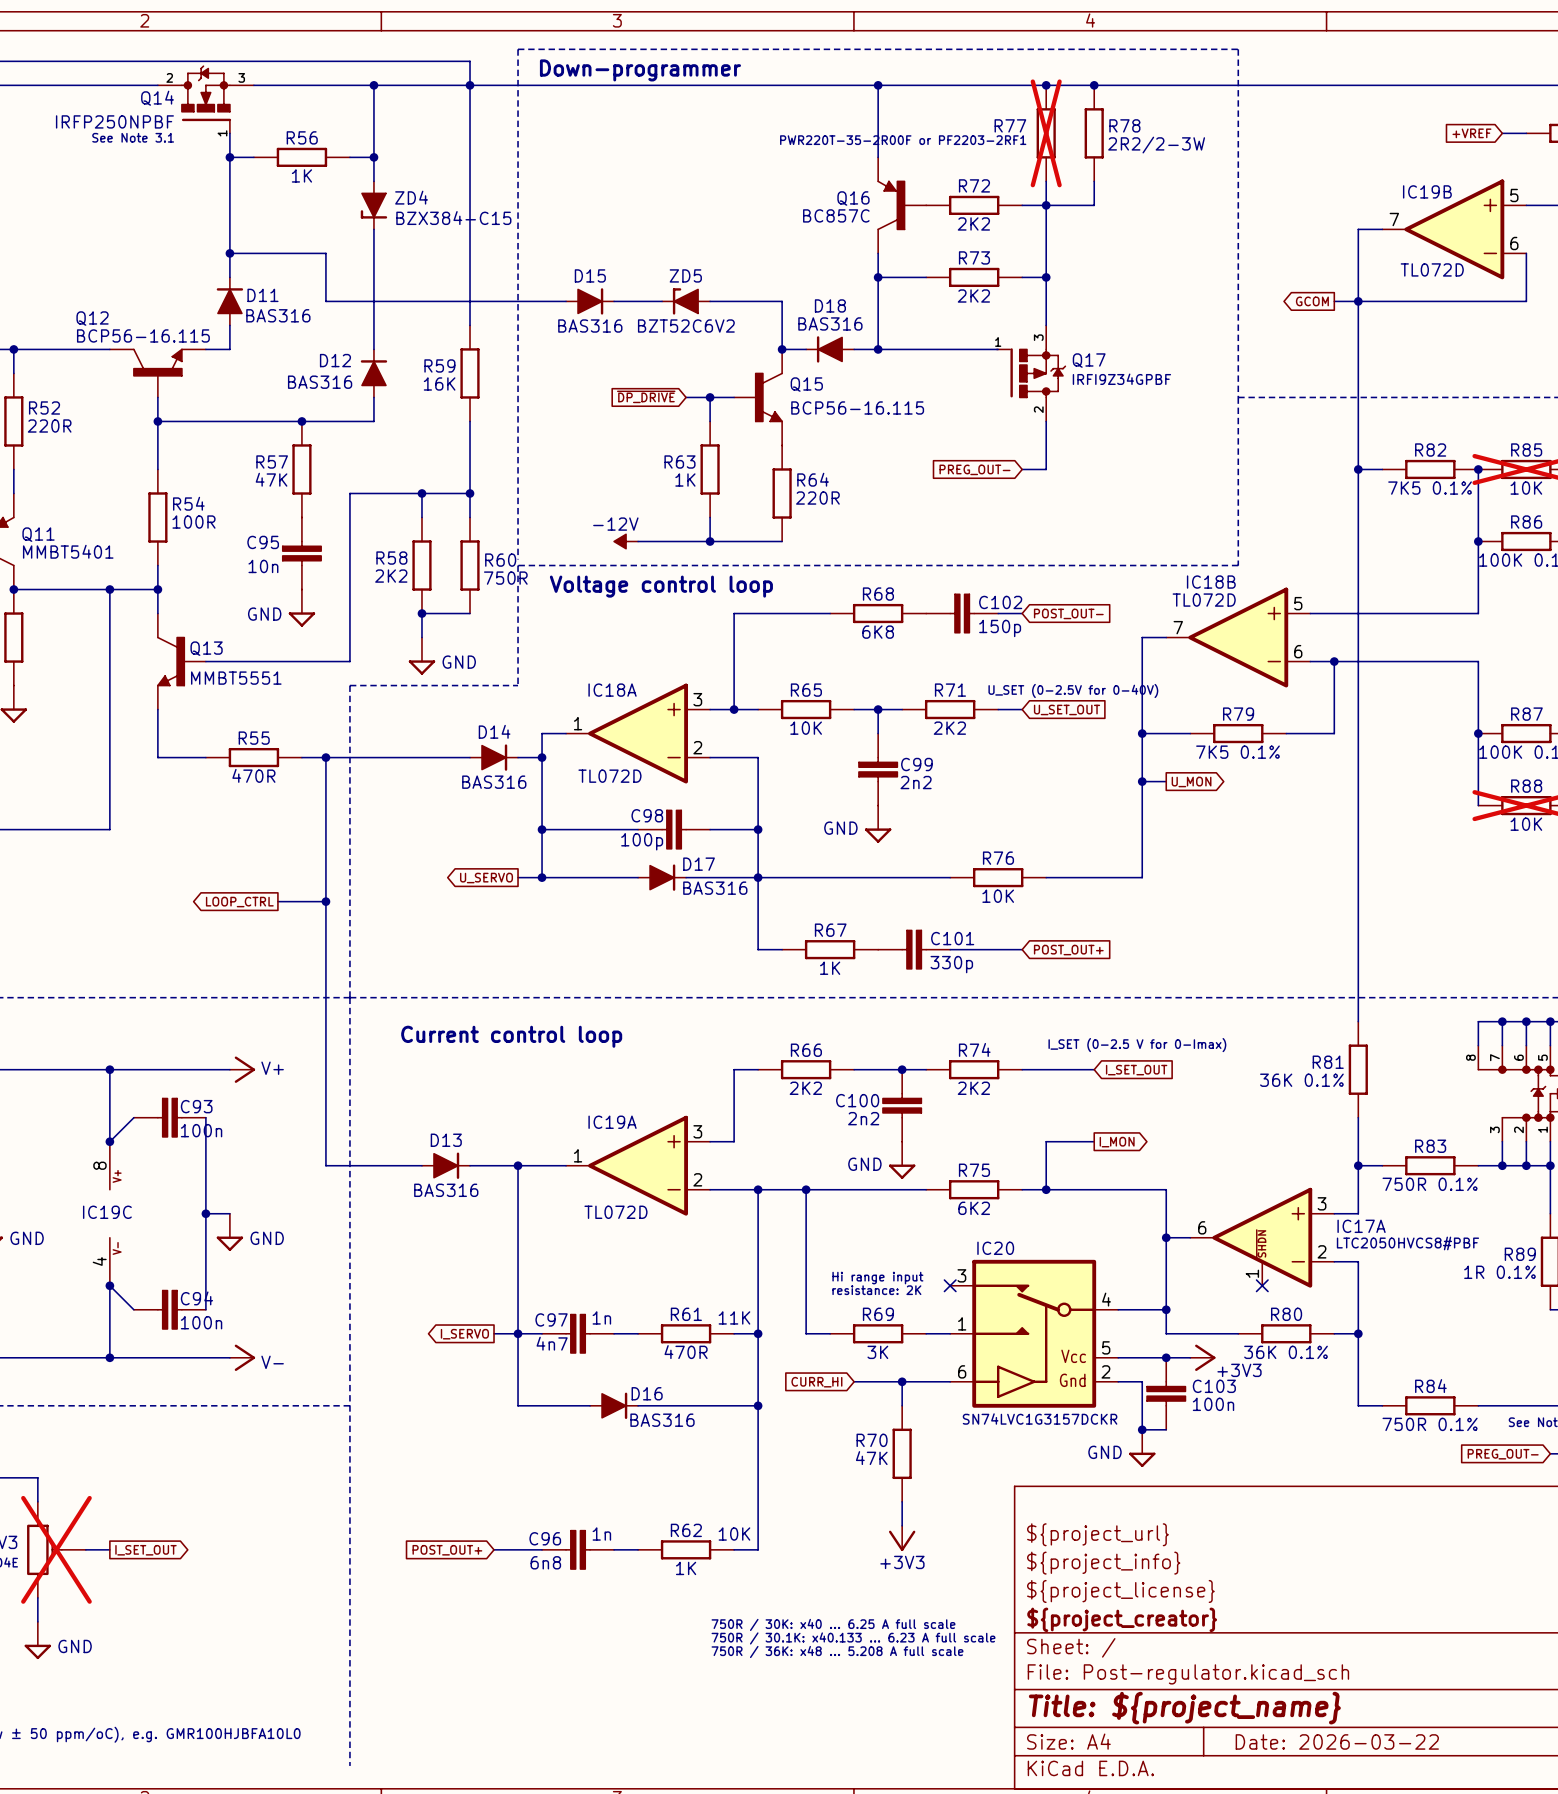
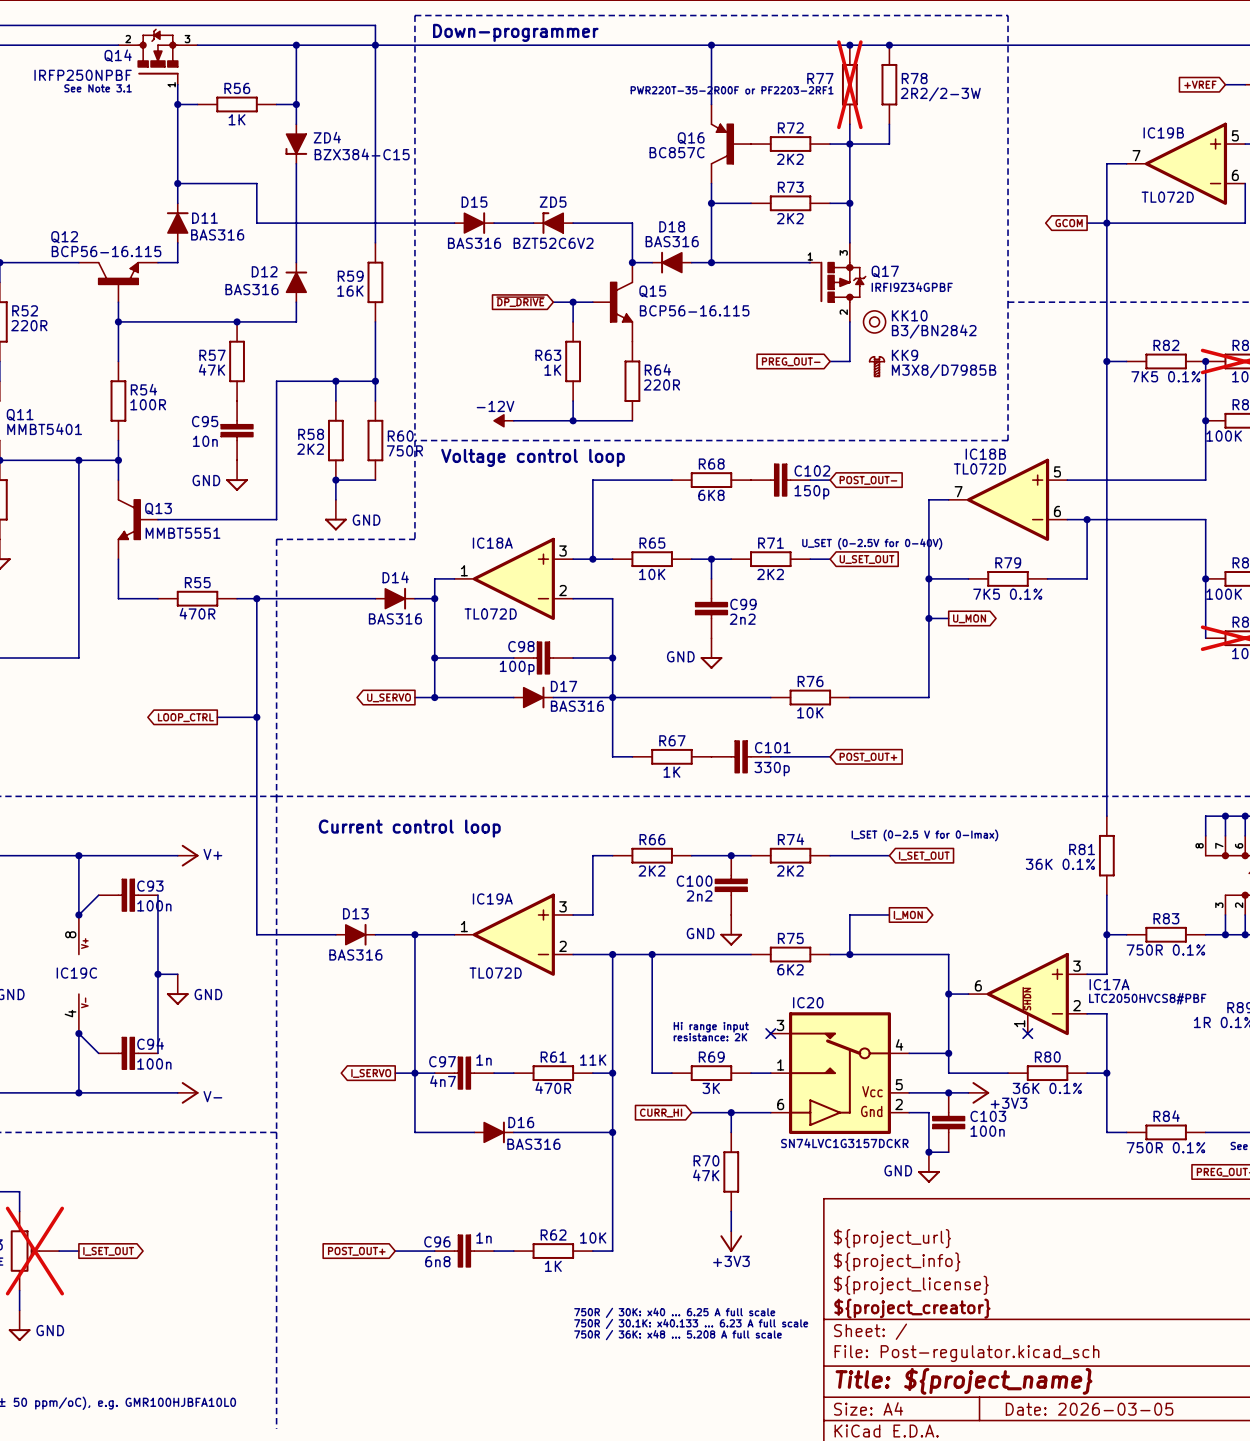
KK10: none -> B3/BN2842 (874, 321)
KK9: none -> M3X8/D7985B (877, 366)
title block: Date: 2026-03-22 (1337, 1741) -> Date: 2026-03-05 (1089, 1409)

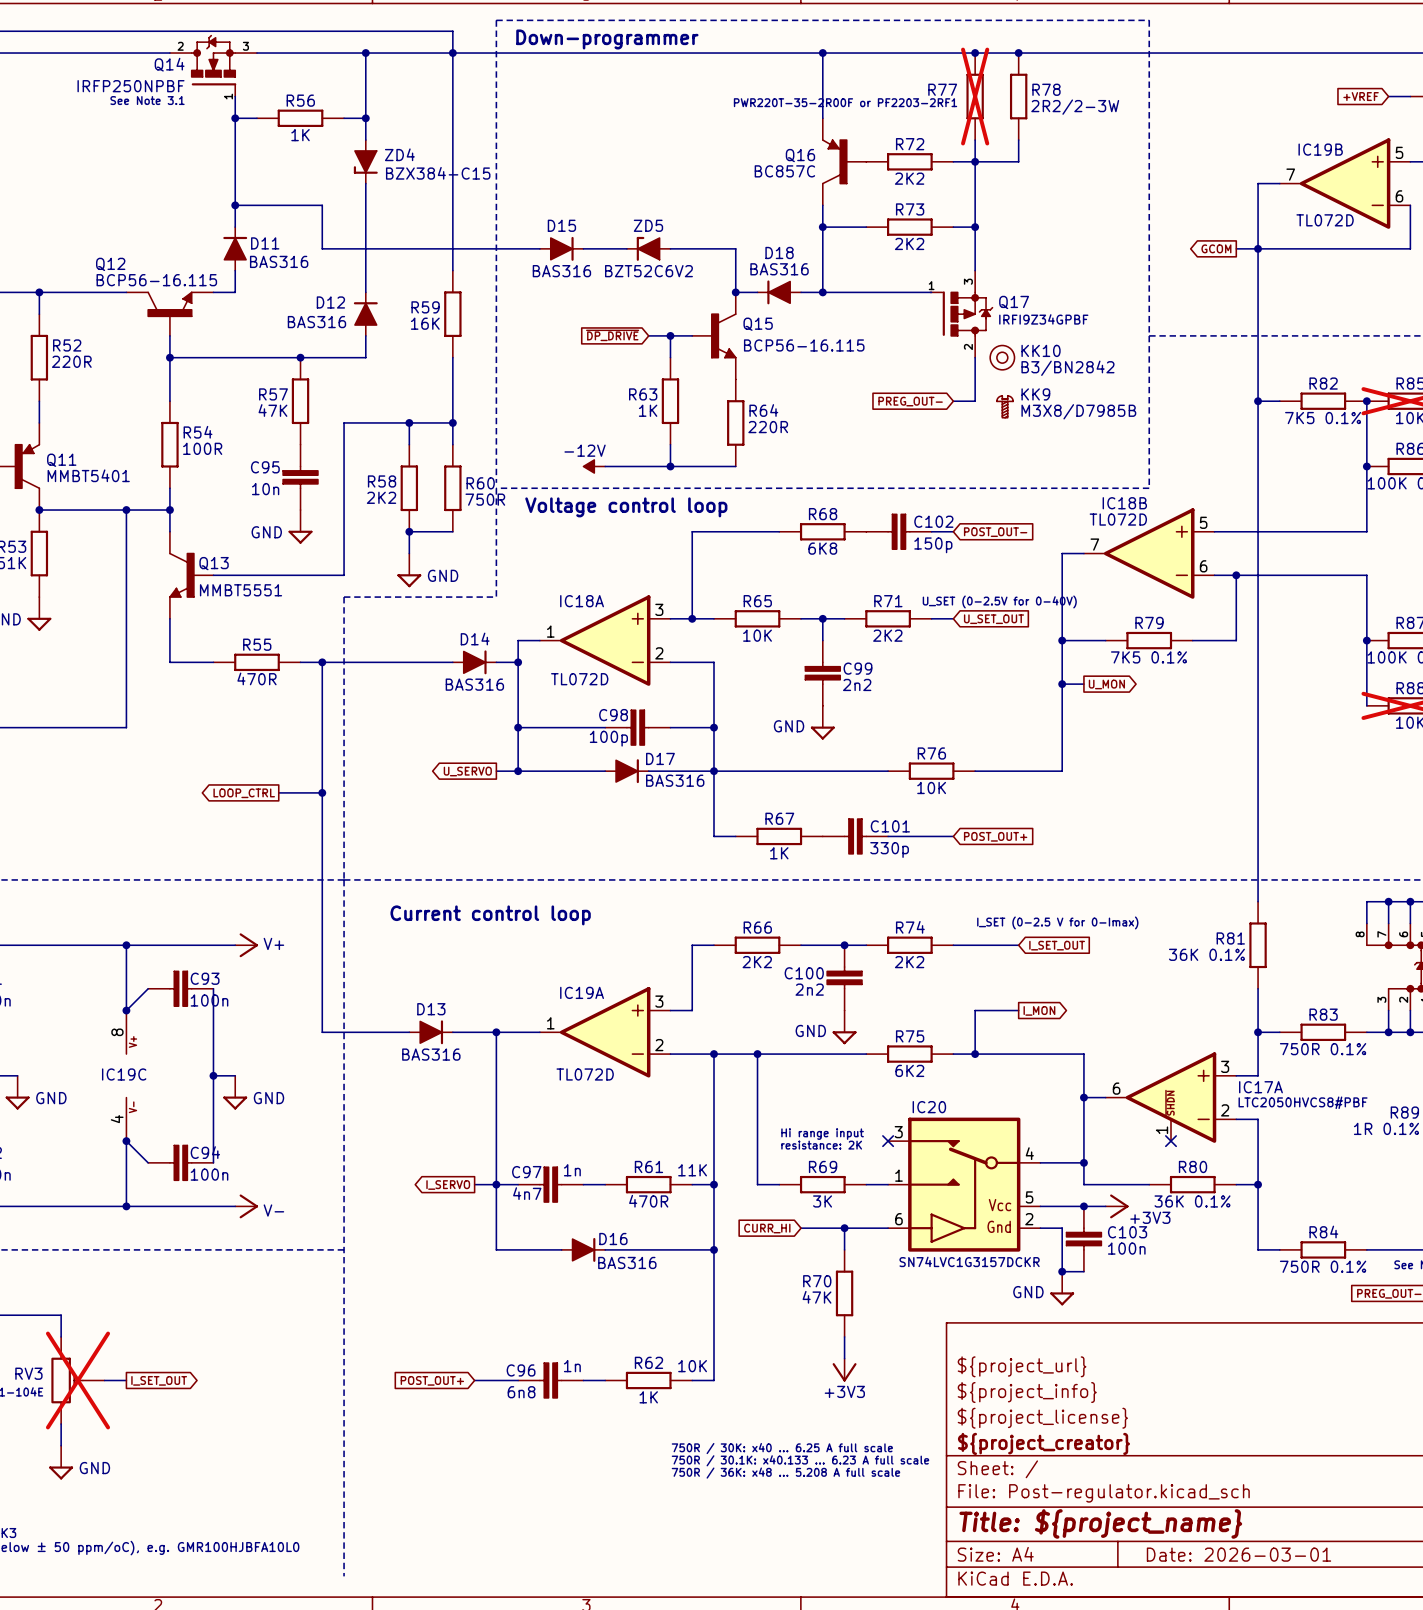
title block: Date: 2026-03-05 (1089, 1409) -> Date: 2026-03-01 (1238, 1554)

